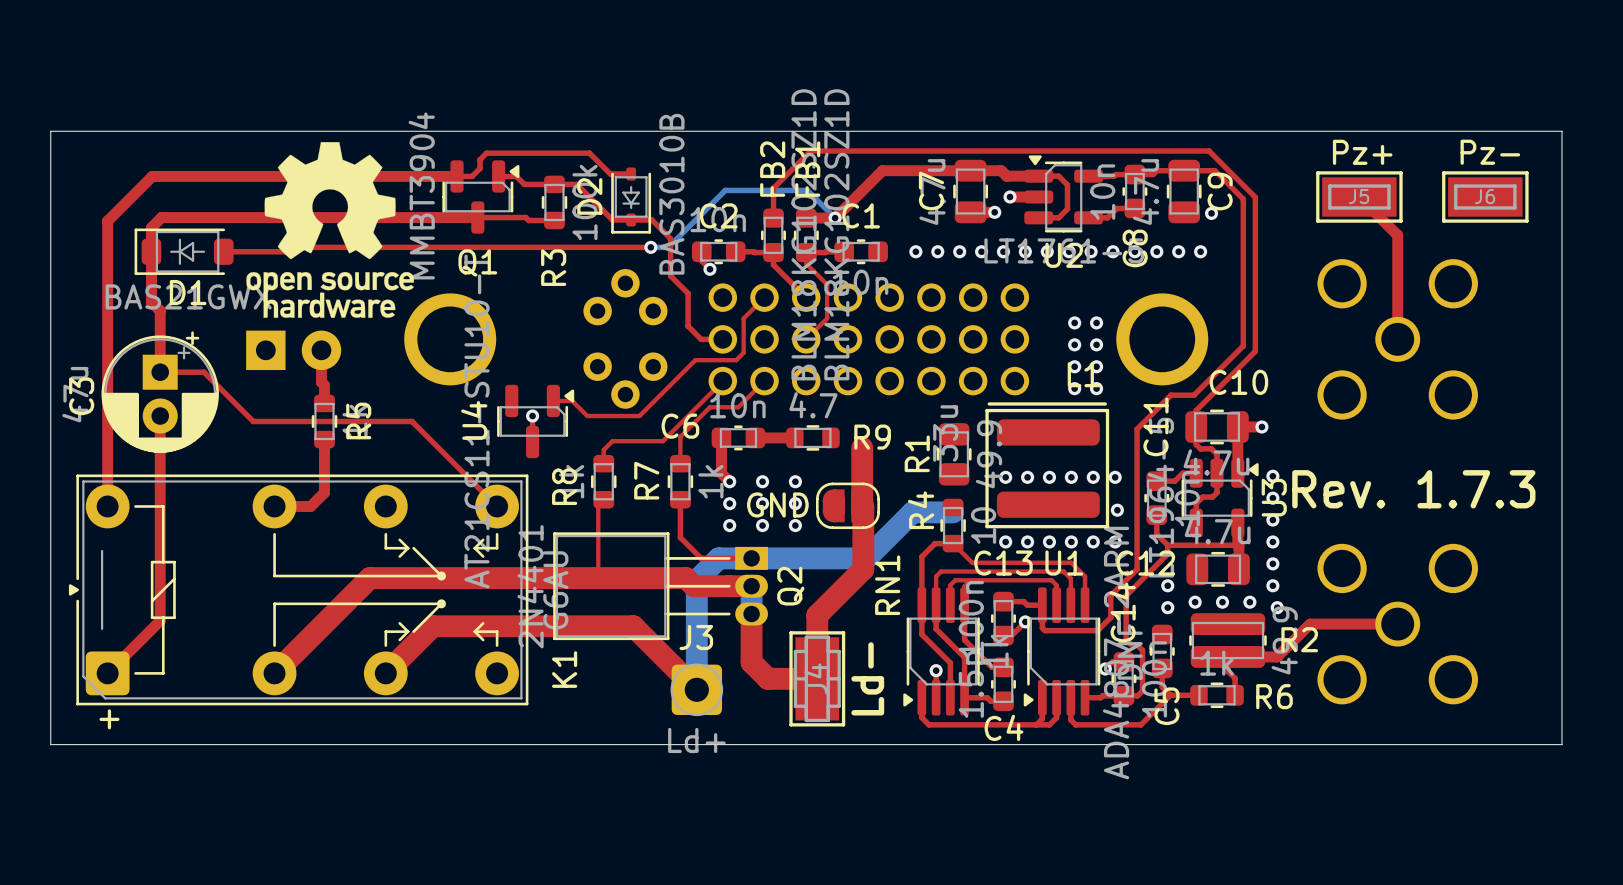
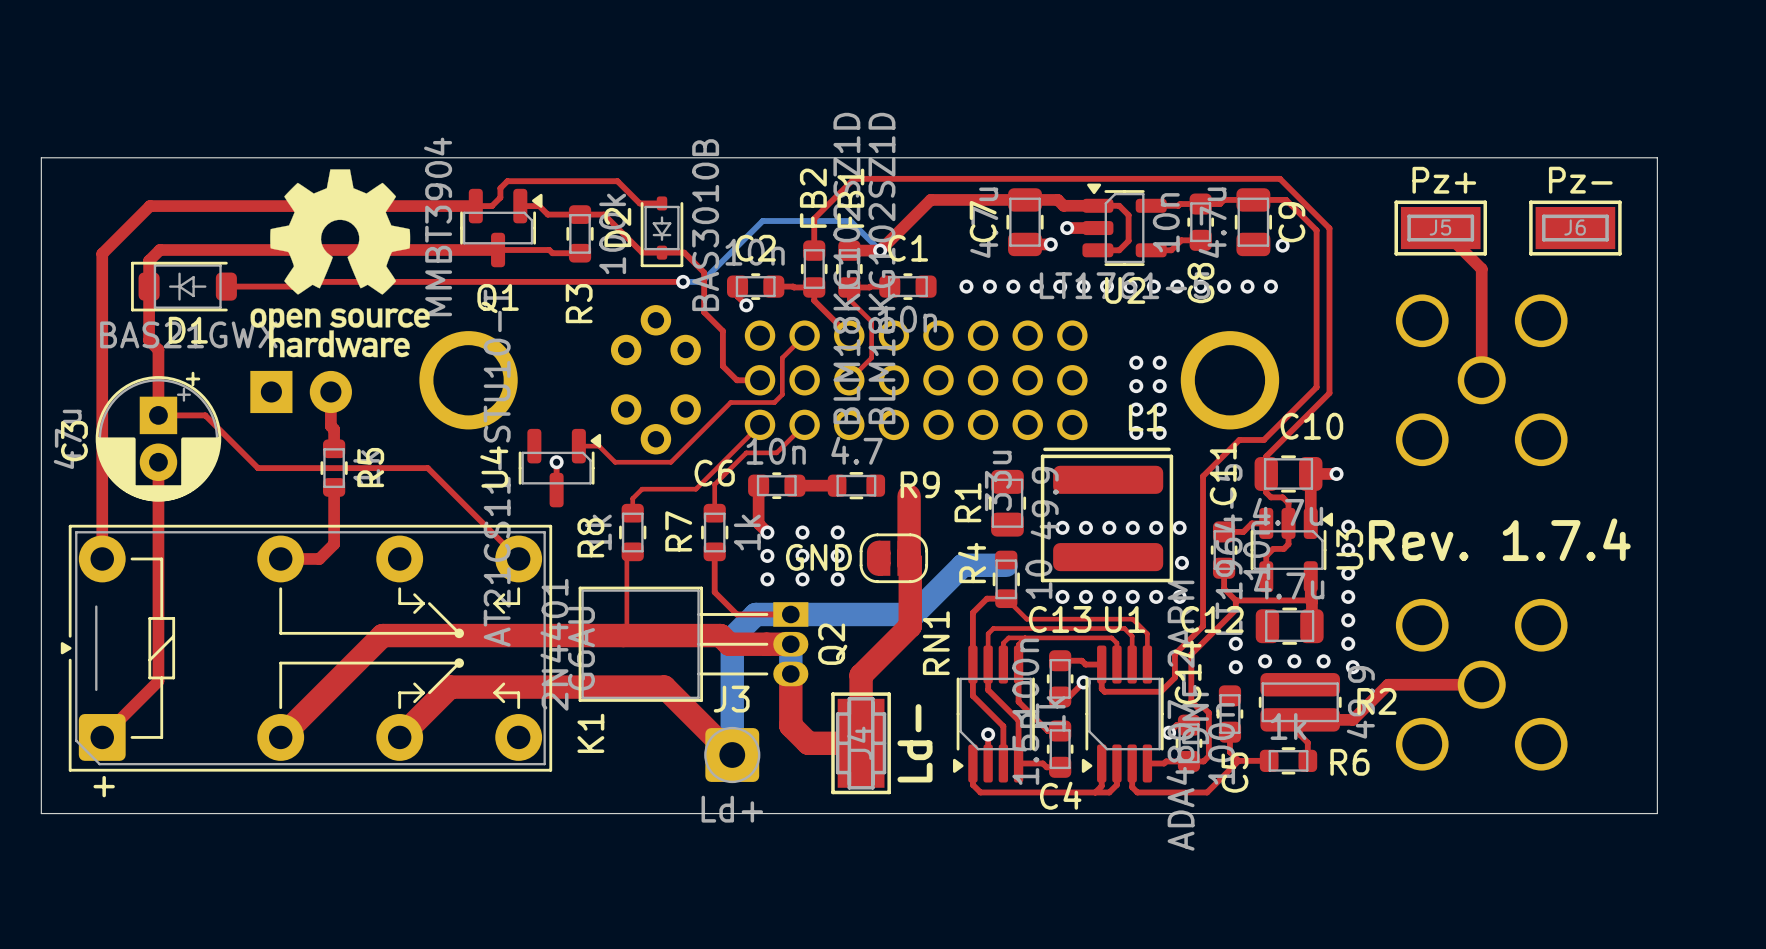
text: Rev. 1.7.3 (1413, 489) -> Rev. 1.7.4 (1499, 539)

